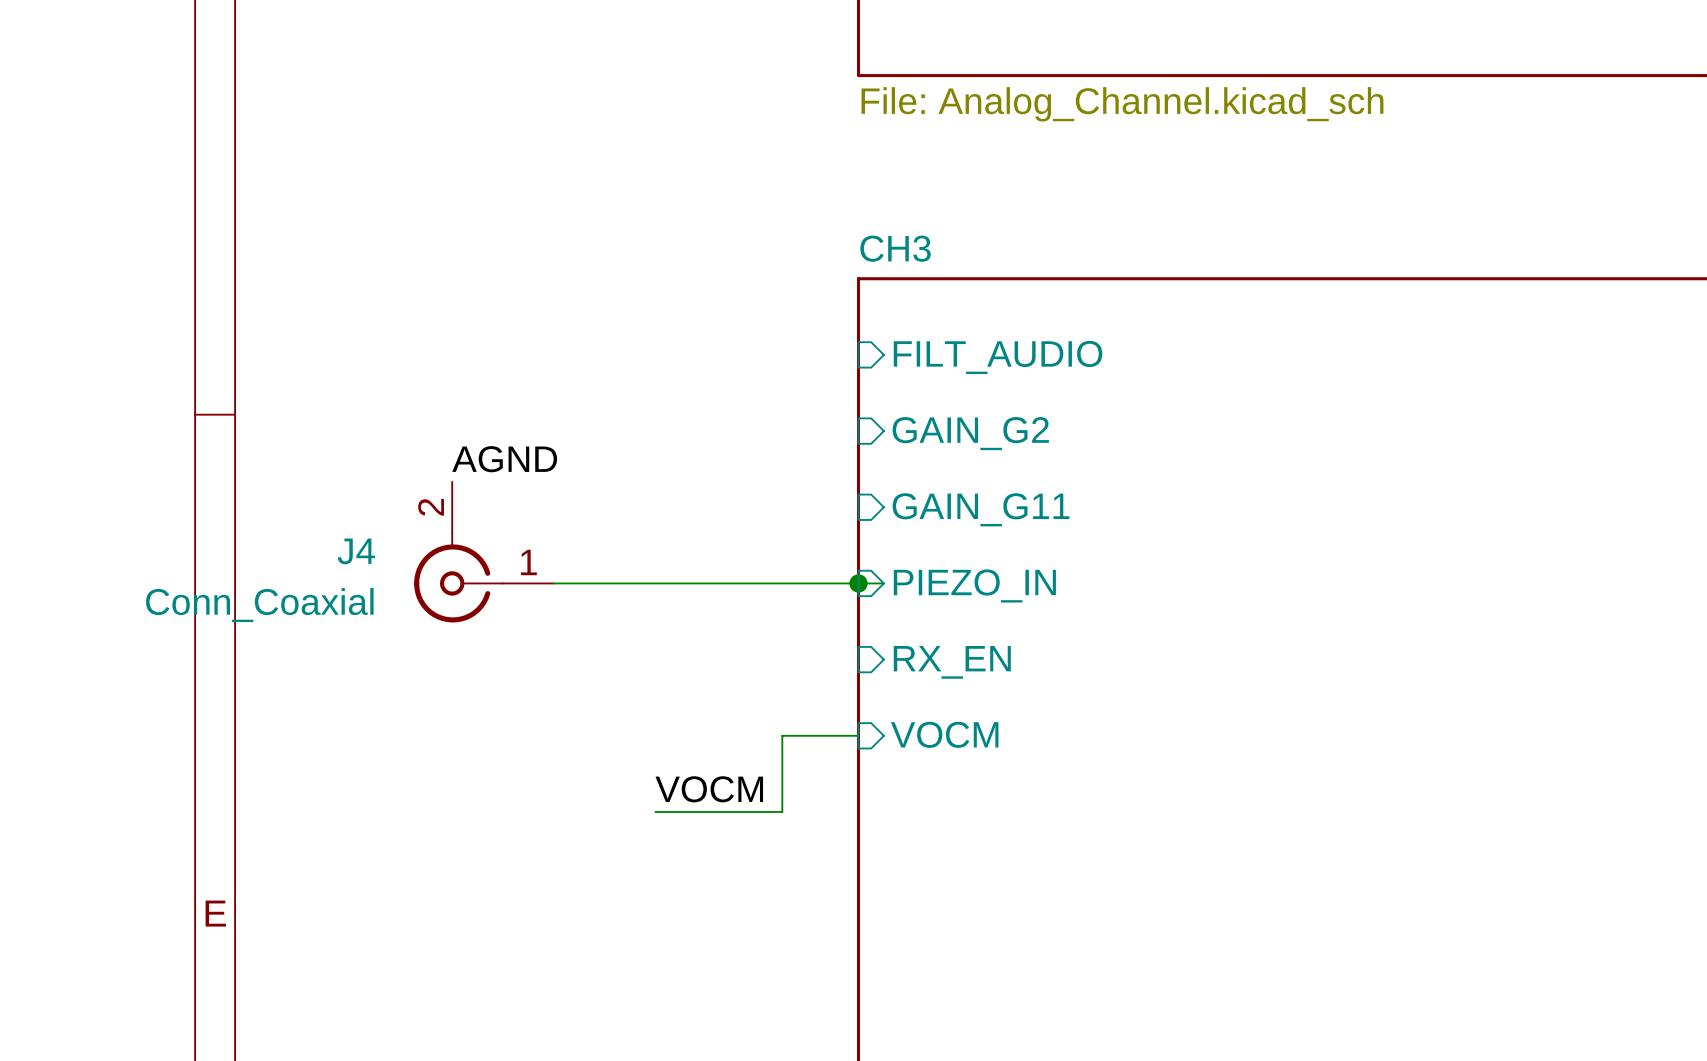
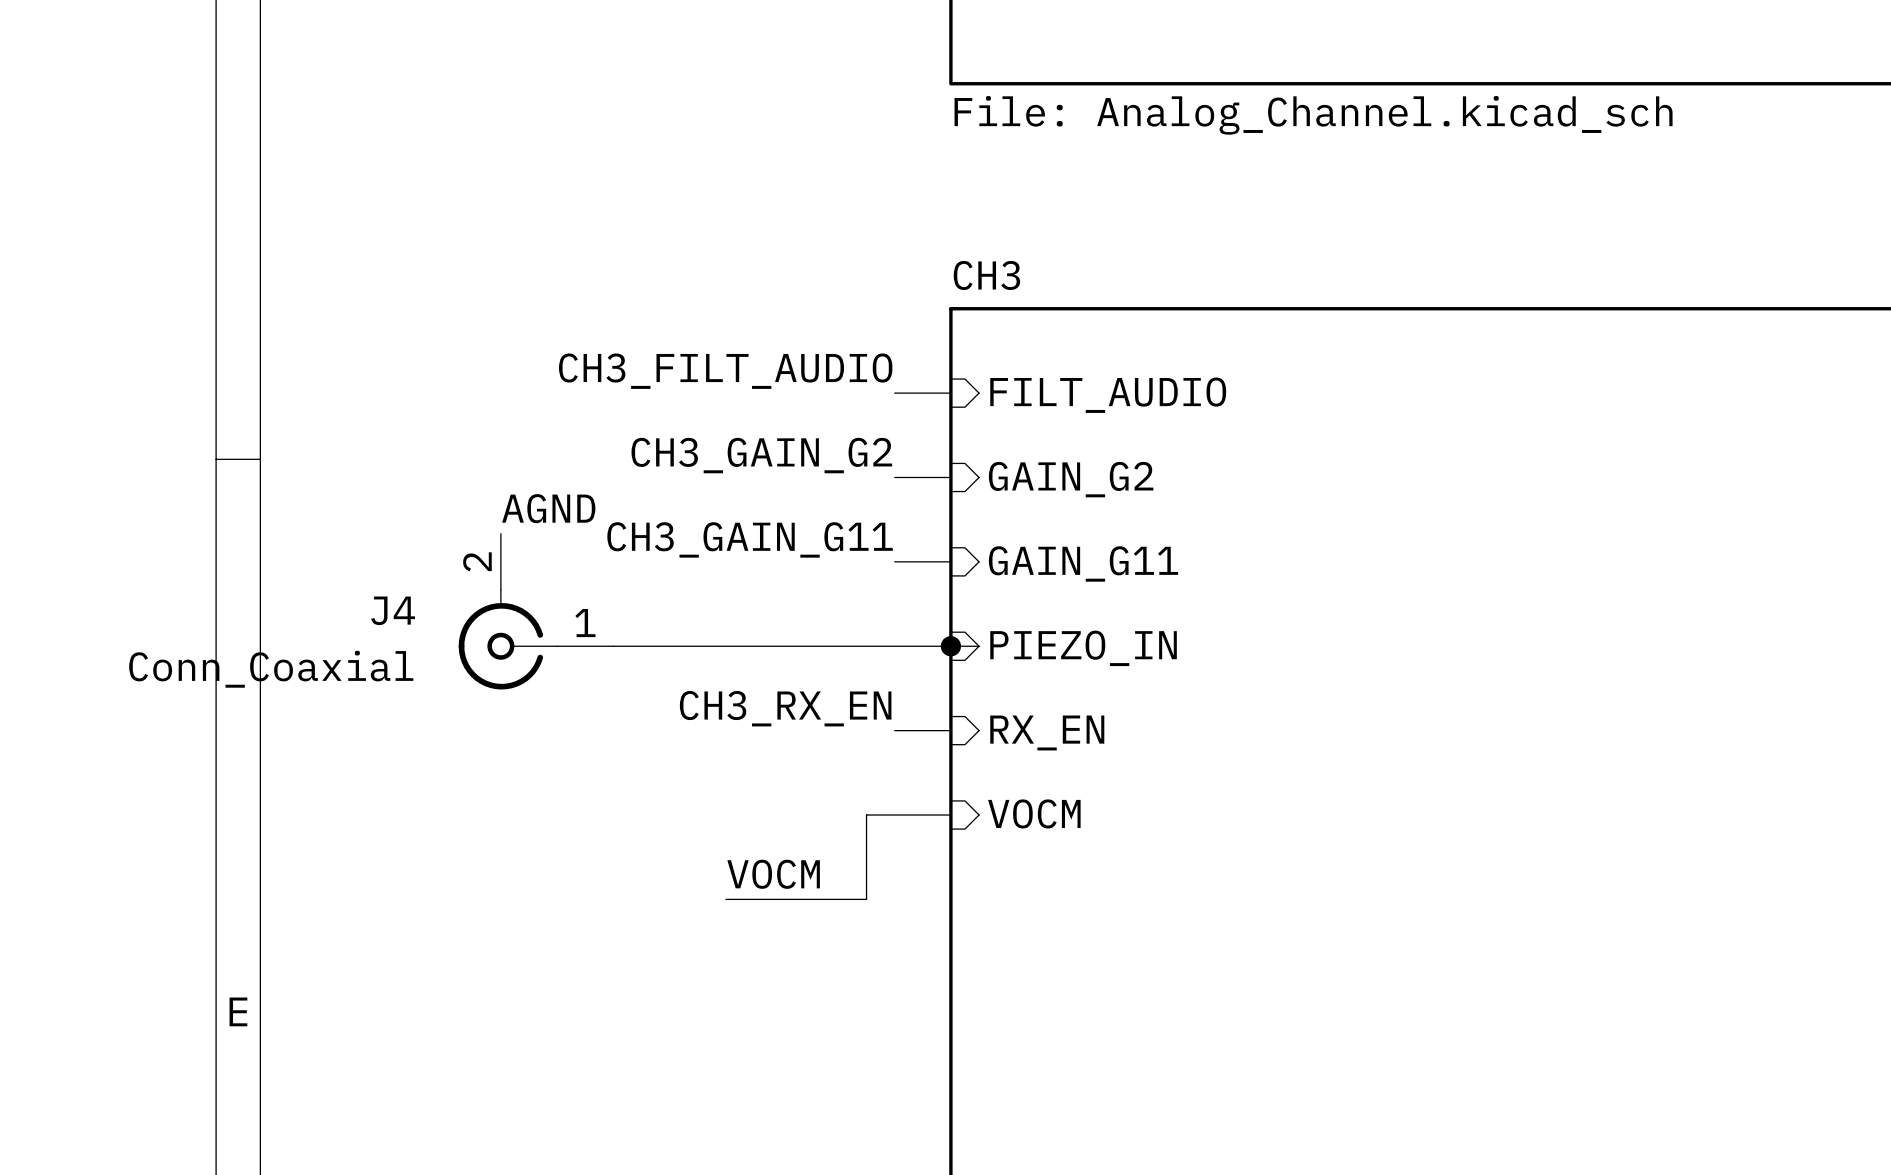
label: none -> CH3_FILT_AUDIO (725, 371)
wire: none -> (894, 393) (950, 393)
label: none -> CH3_GAIN_G2 (761, 455)
wire: none -> (894, 477) (950, 477)
label: none -> CH3_GAIN_G11 (750, 539)
wire: none -> (894, 561) (950, 561)
label: none -> CH3_RX_EN (785, 708)
wire: none -> (894, 730) (950, 730)

